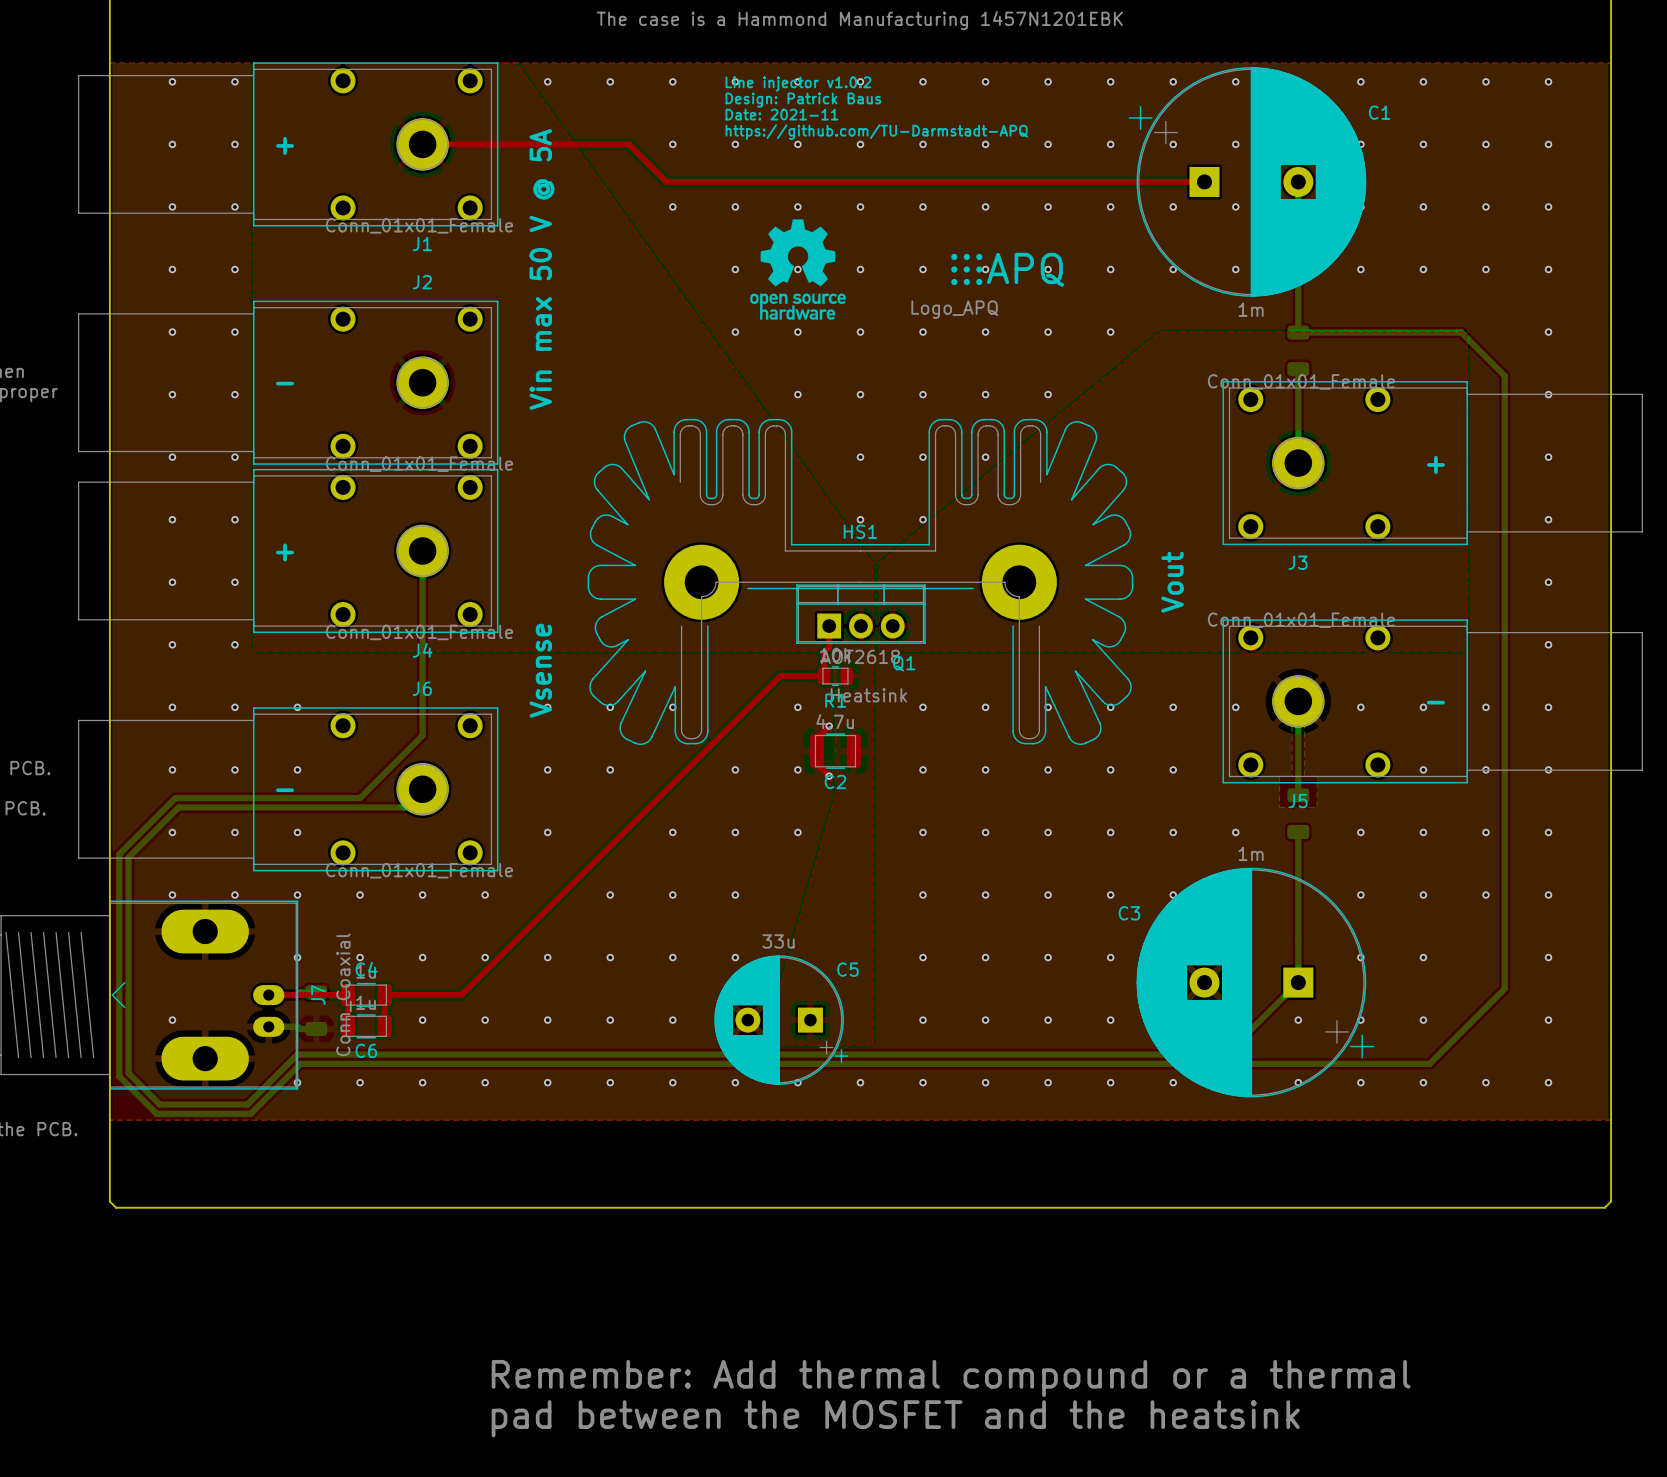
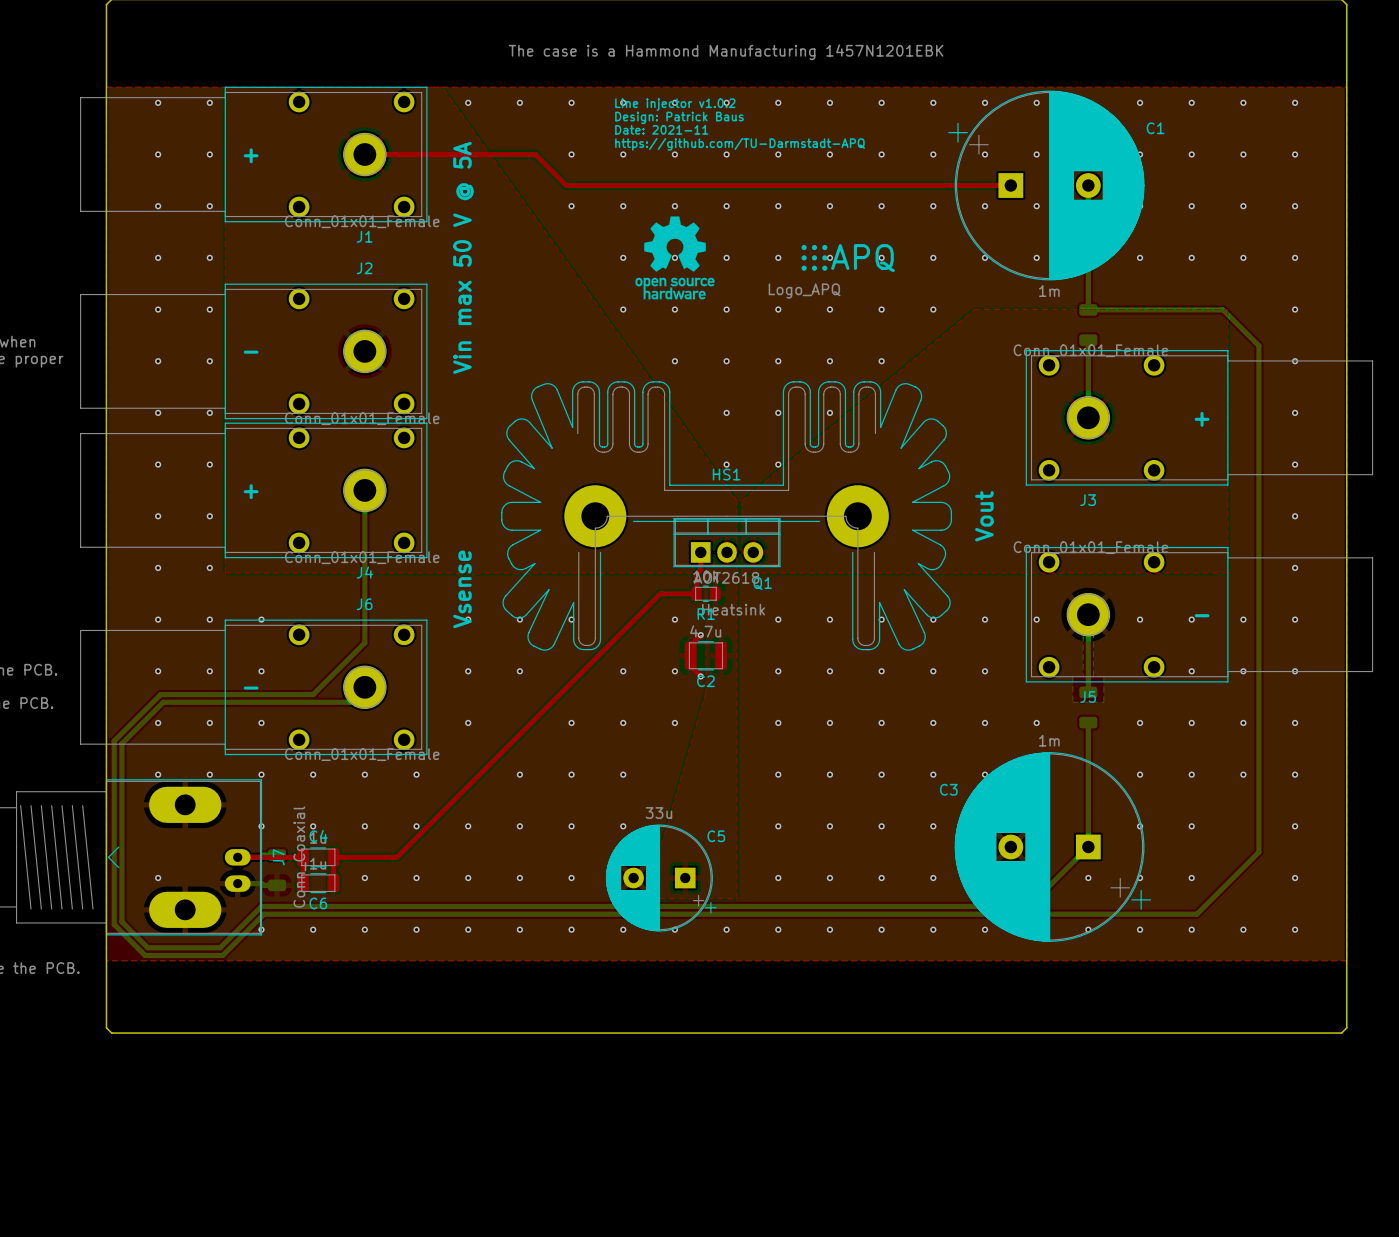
text: Remember: Add thermal compound or a thermal (951, 1378) -> none
text: pad between the MOSFET and the heatsink (895, 1418) -> none

